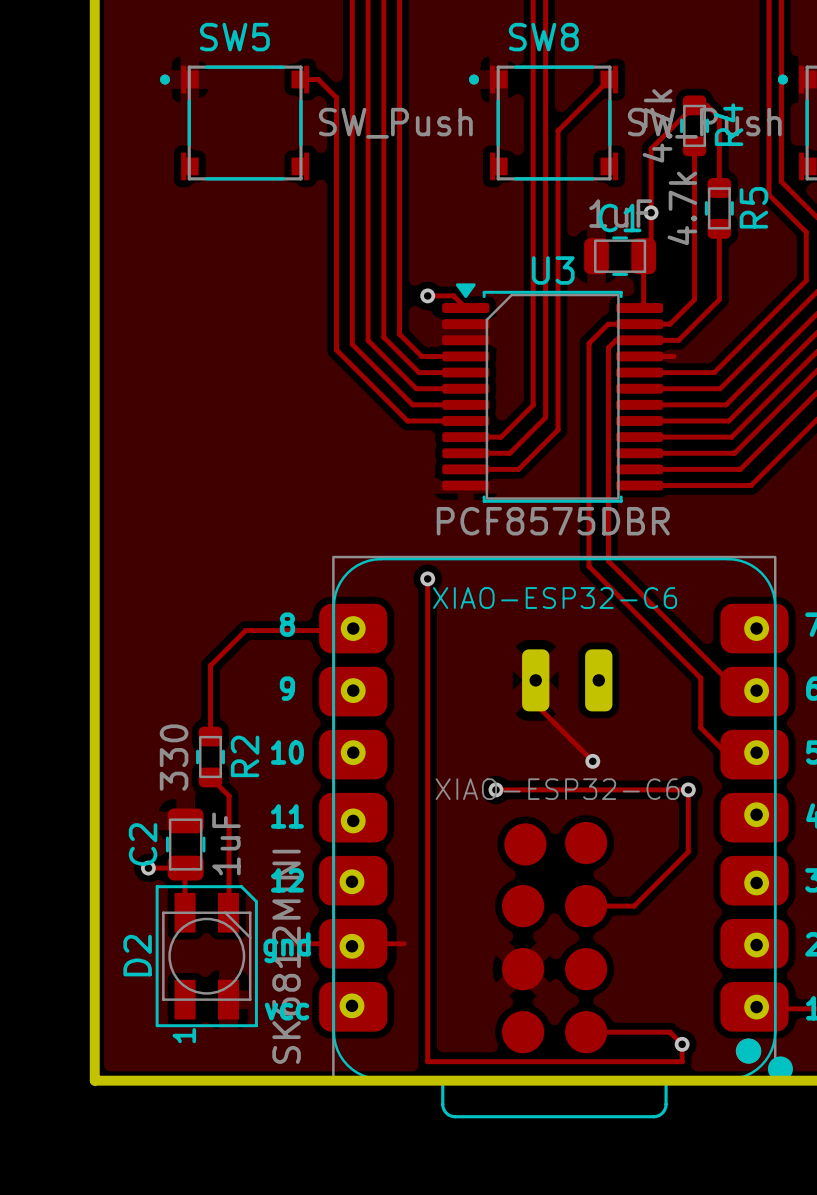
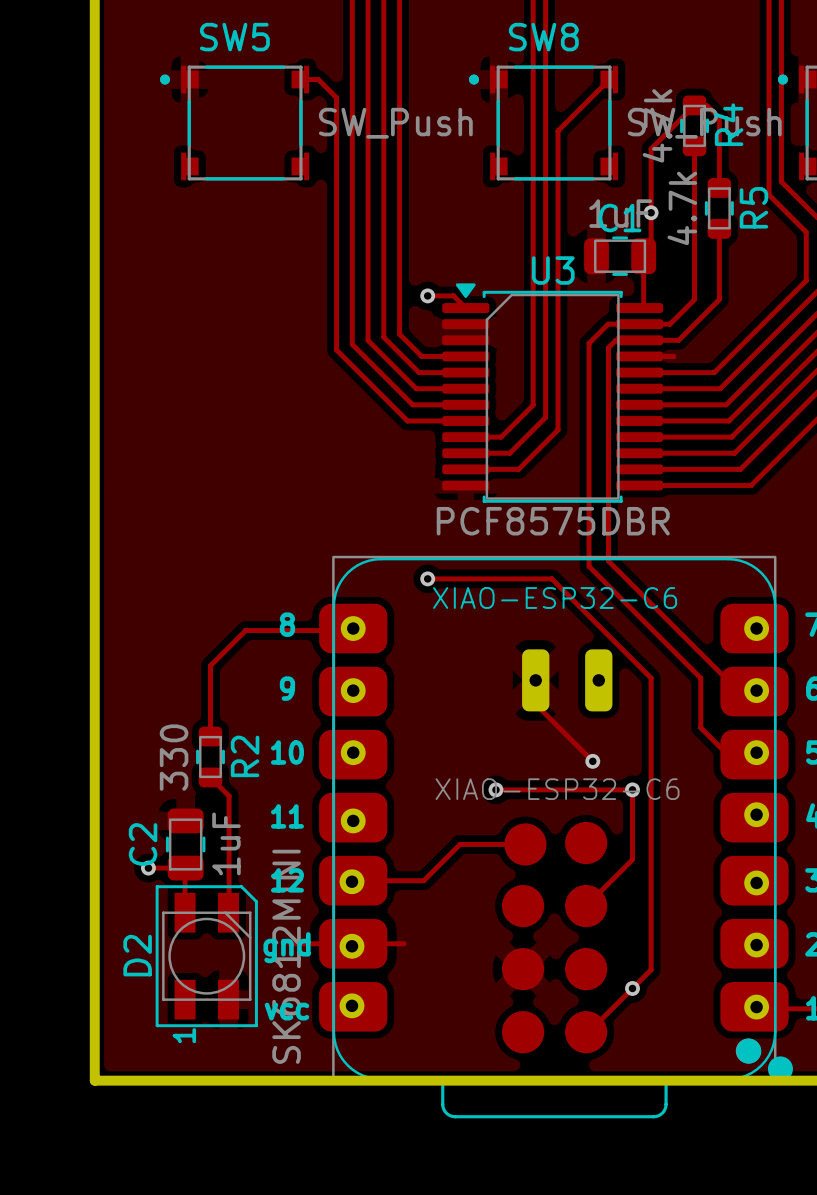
track: (427, 578) (427, 1061) (682, 1061) (682, 1044) (670, 1032) (588, 1032) -> (427, 578) (551, 578) (651, 678) (651, 969) (588, 1032)
track: (632, 789) (688, 789) (688, 851) (634, 906) (586, 906) -> (632, 789) (632, 859) (586, 906)
via position: (688, 789) -> (632, 789)
track: none -> (525, 844) (460, 844) (423, 880) (353, 880)
via position: (682, 1044) -> (632, 988)

